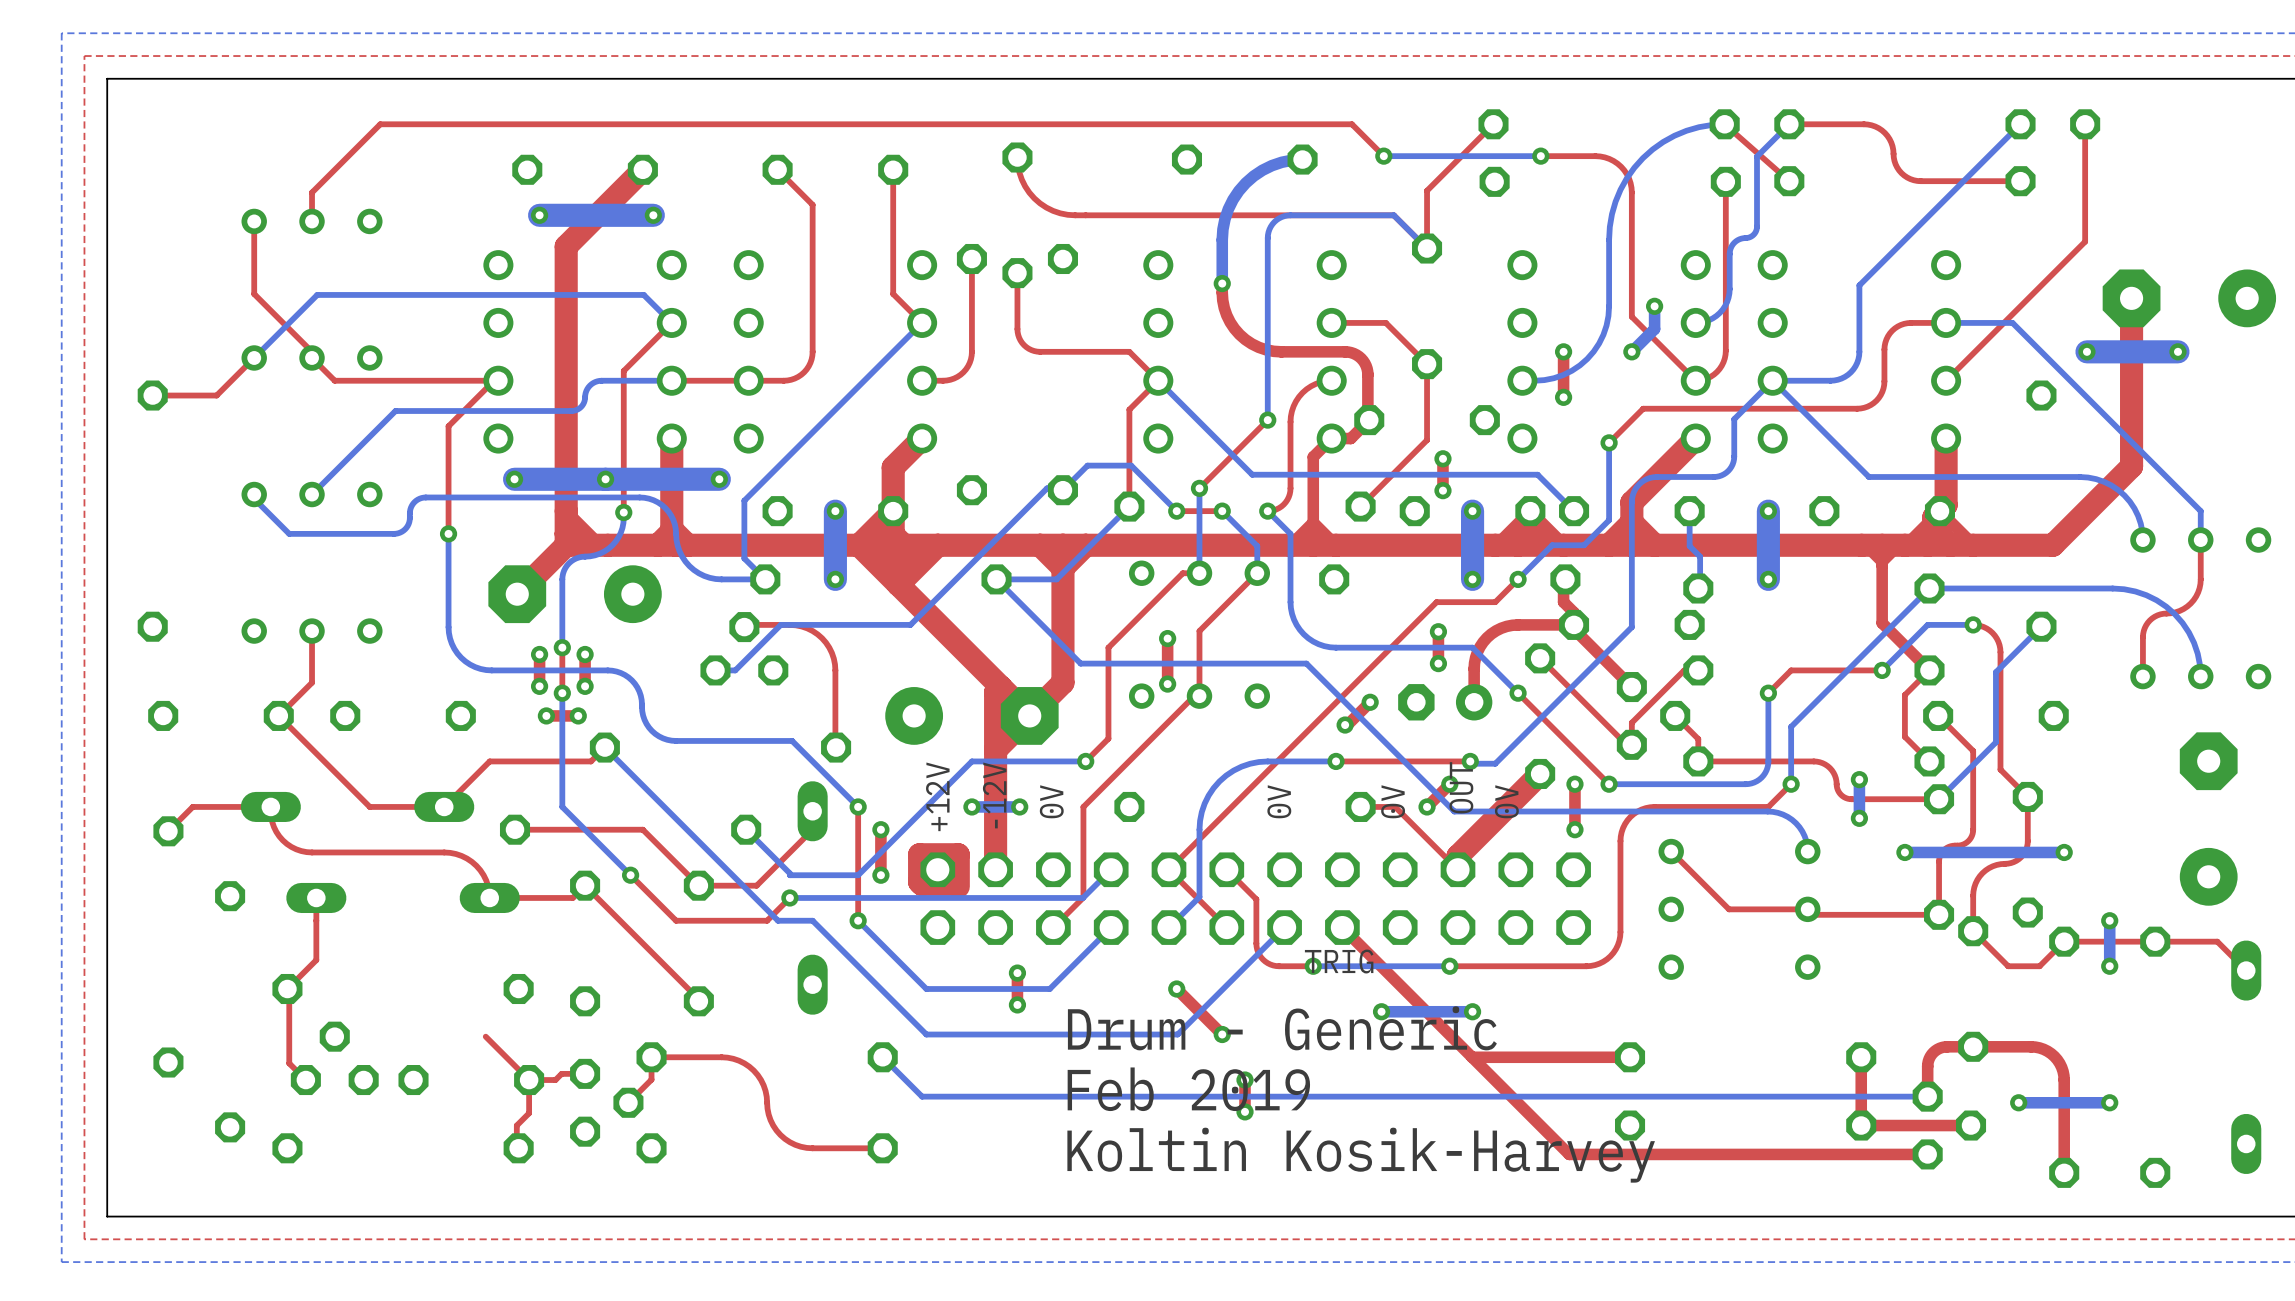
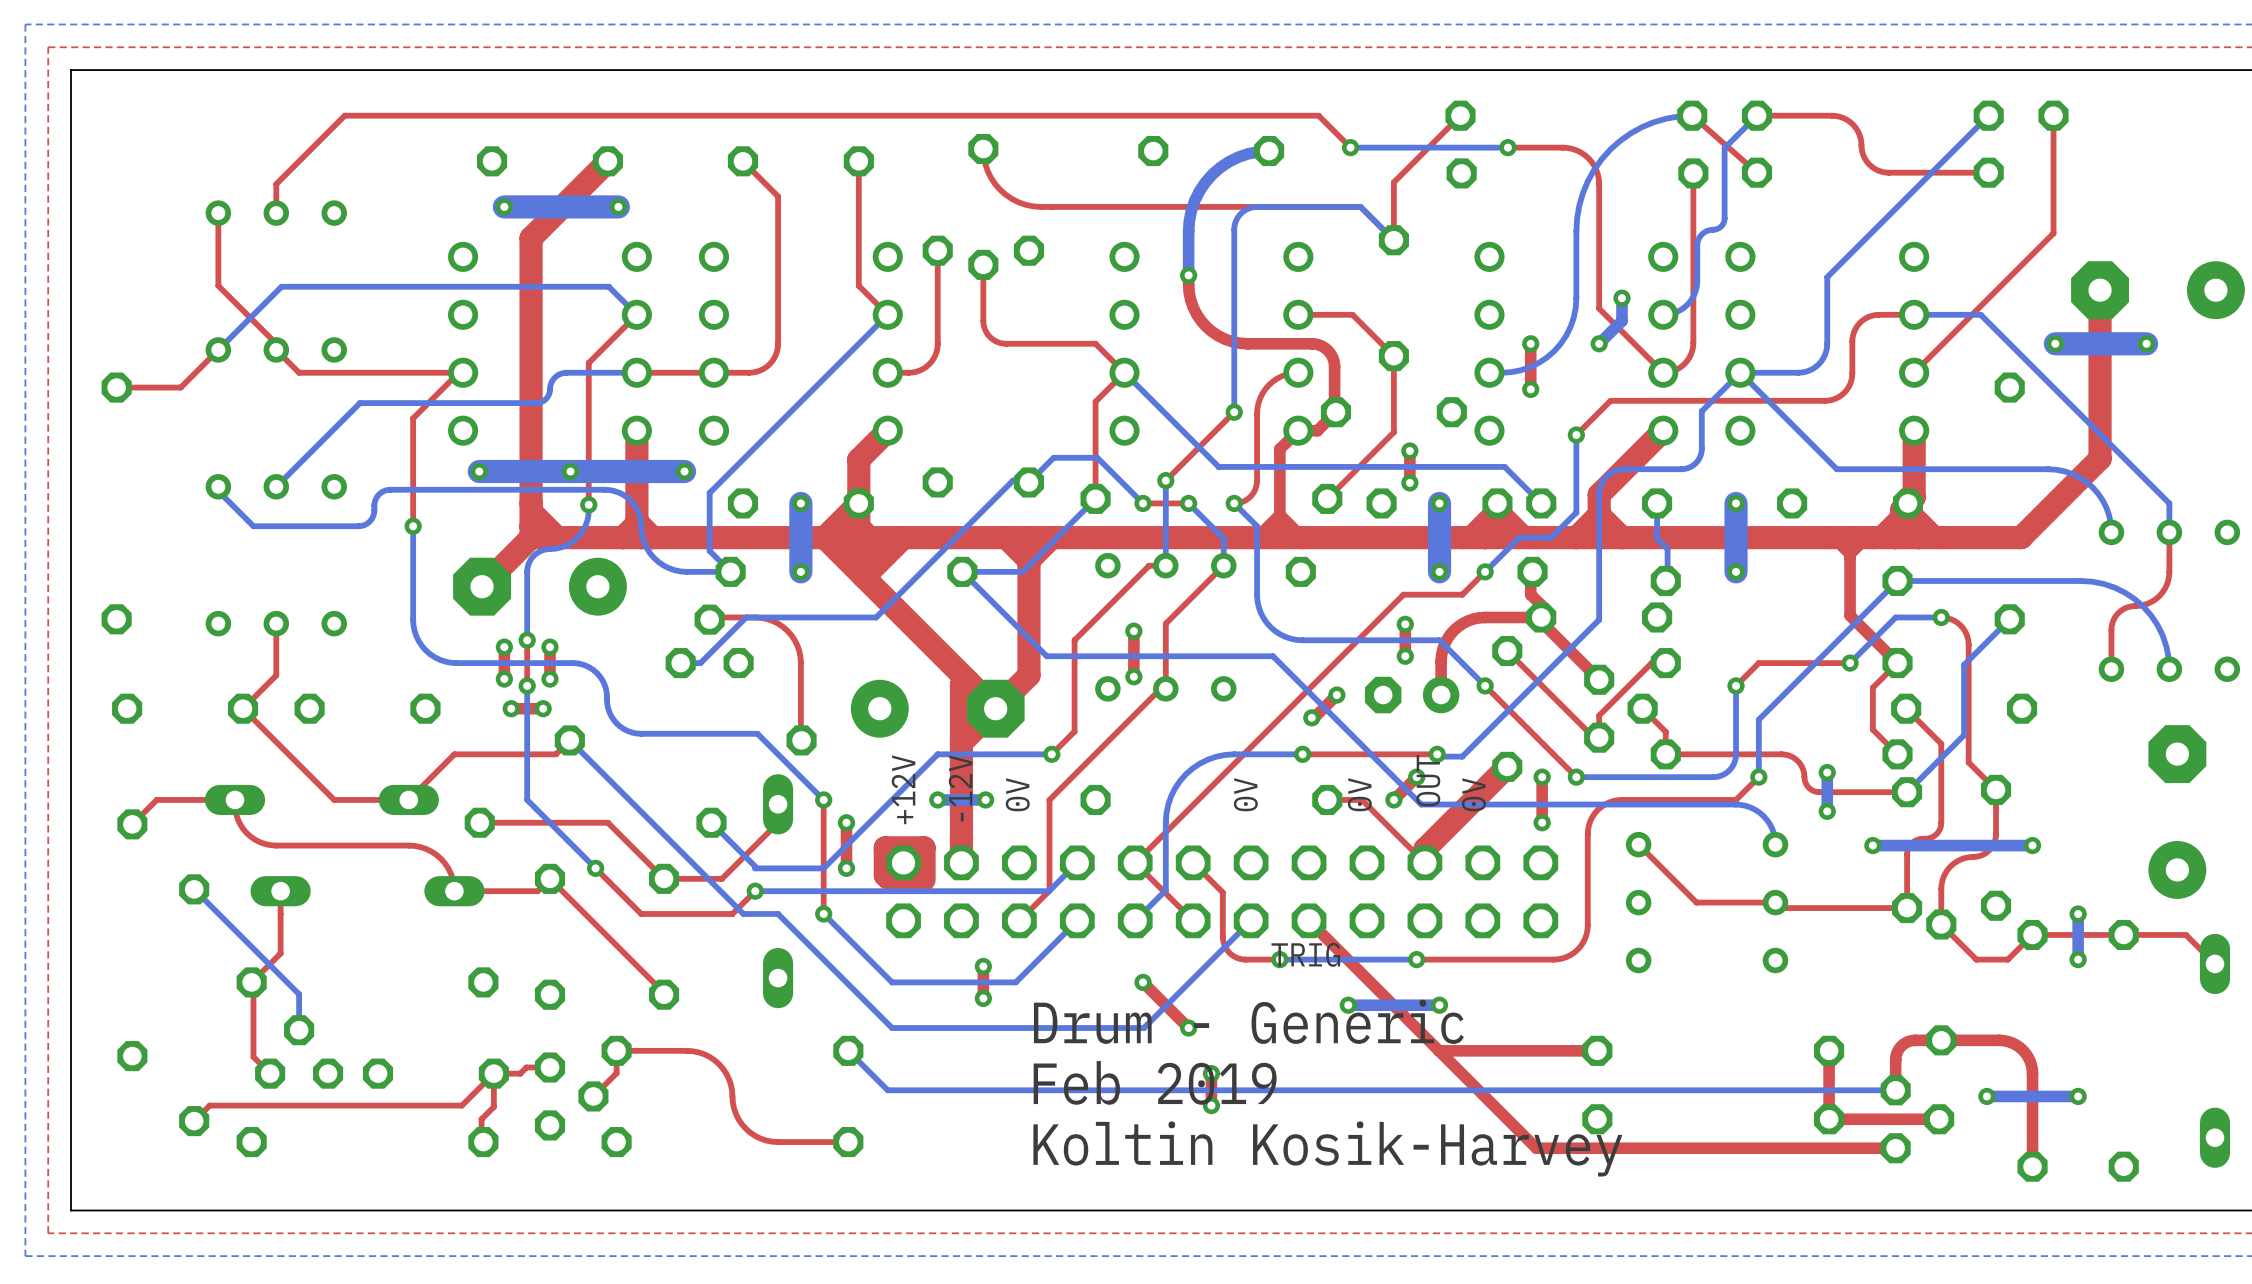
bottom track: none -> (194, 889) (299, 994) (299, 1030)
top track: (485, 1036) (529, 1080) -> (194, 1121) (209, 1105) (461, 1105) (493, 1073)

